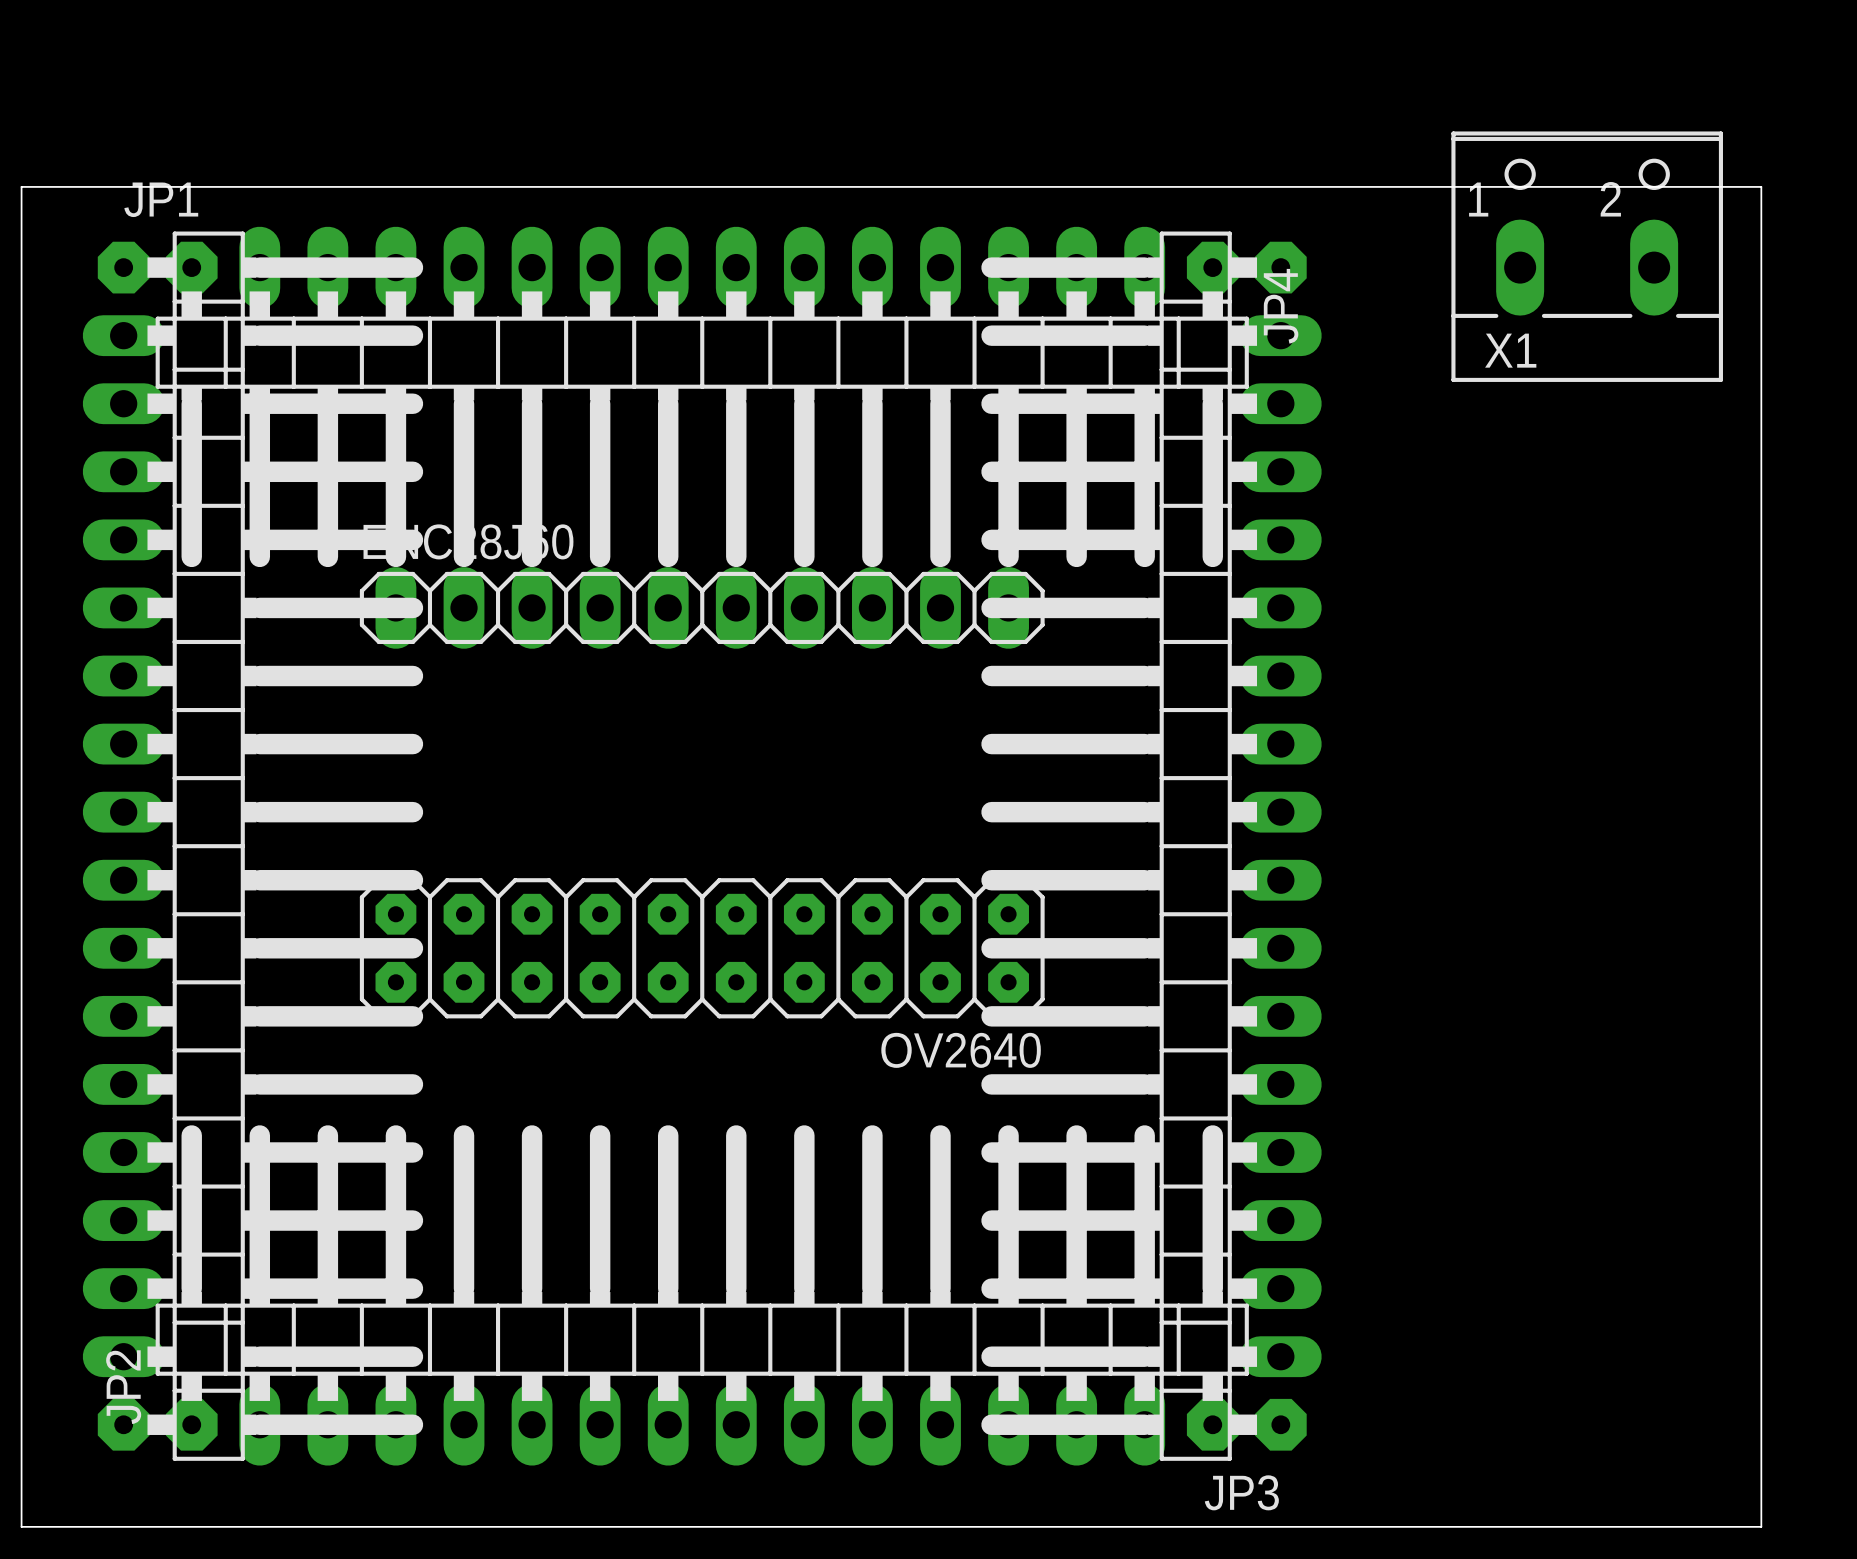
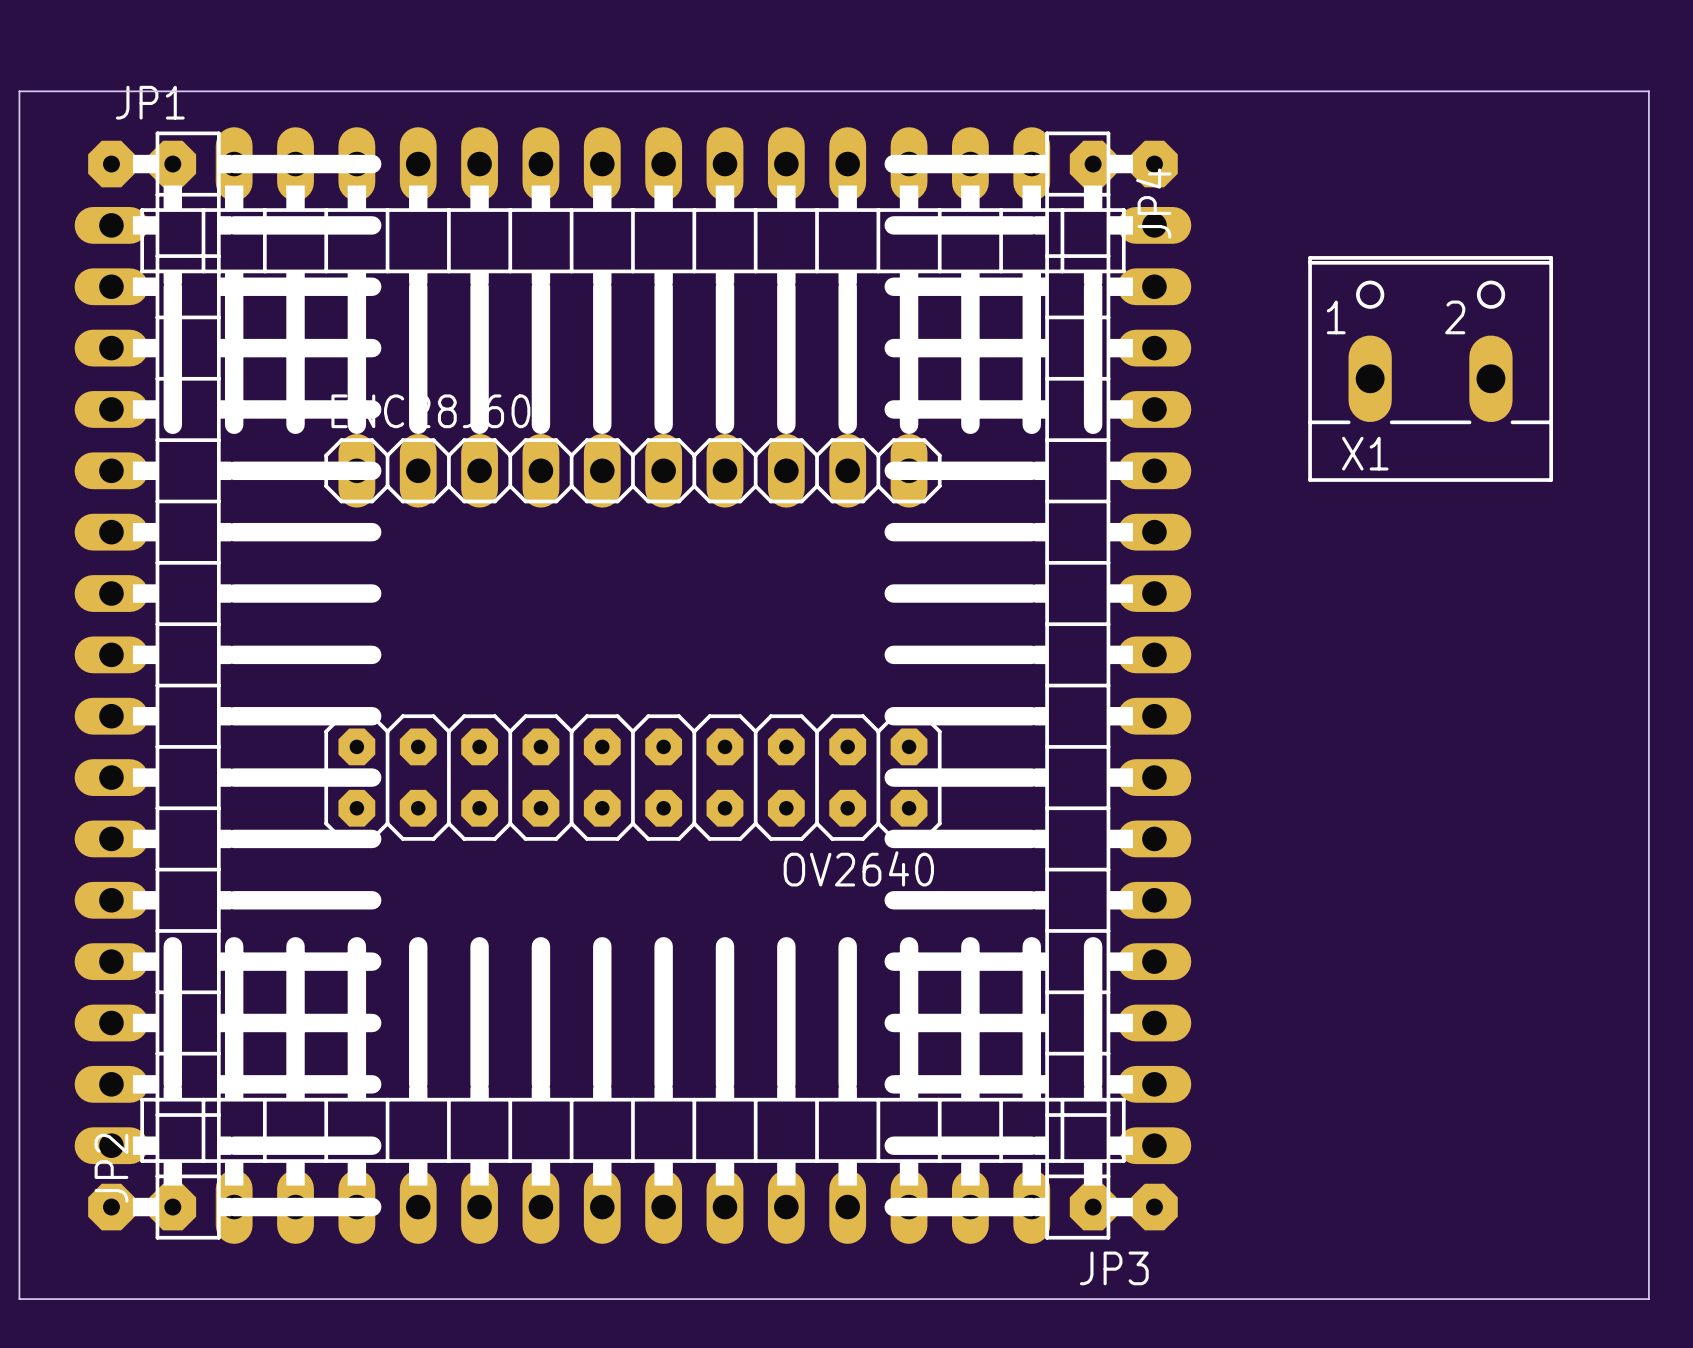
board edge: (1761, 186) (1761, 1526) -> (1587, 91) (1648, 91) (1648, 1299) (1587, 1299)
X1 position: (1587, 256) -> (1430, 368)

